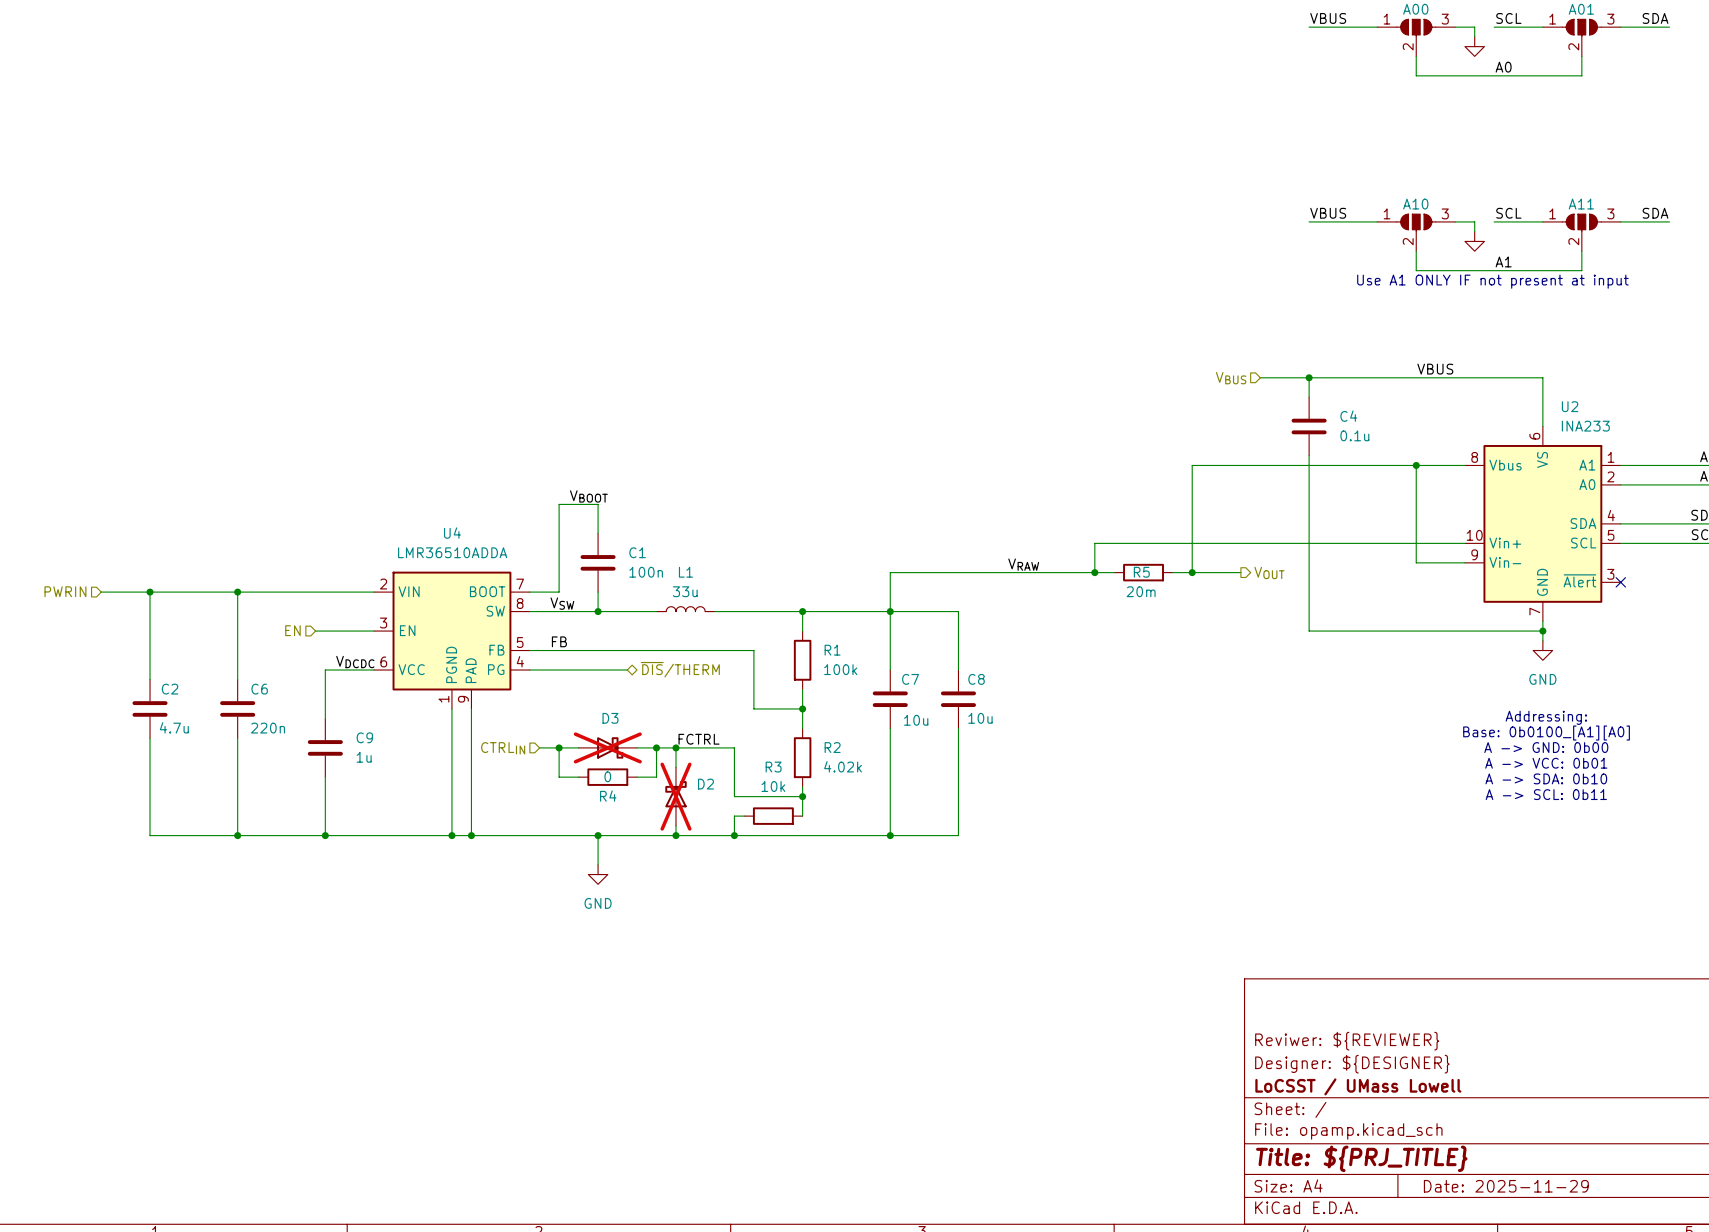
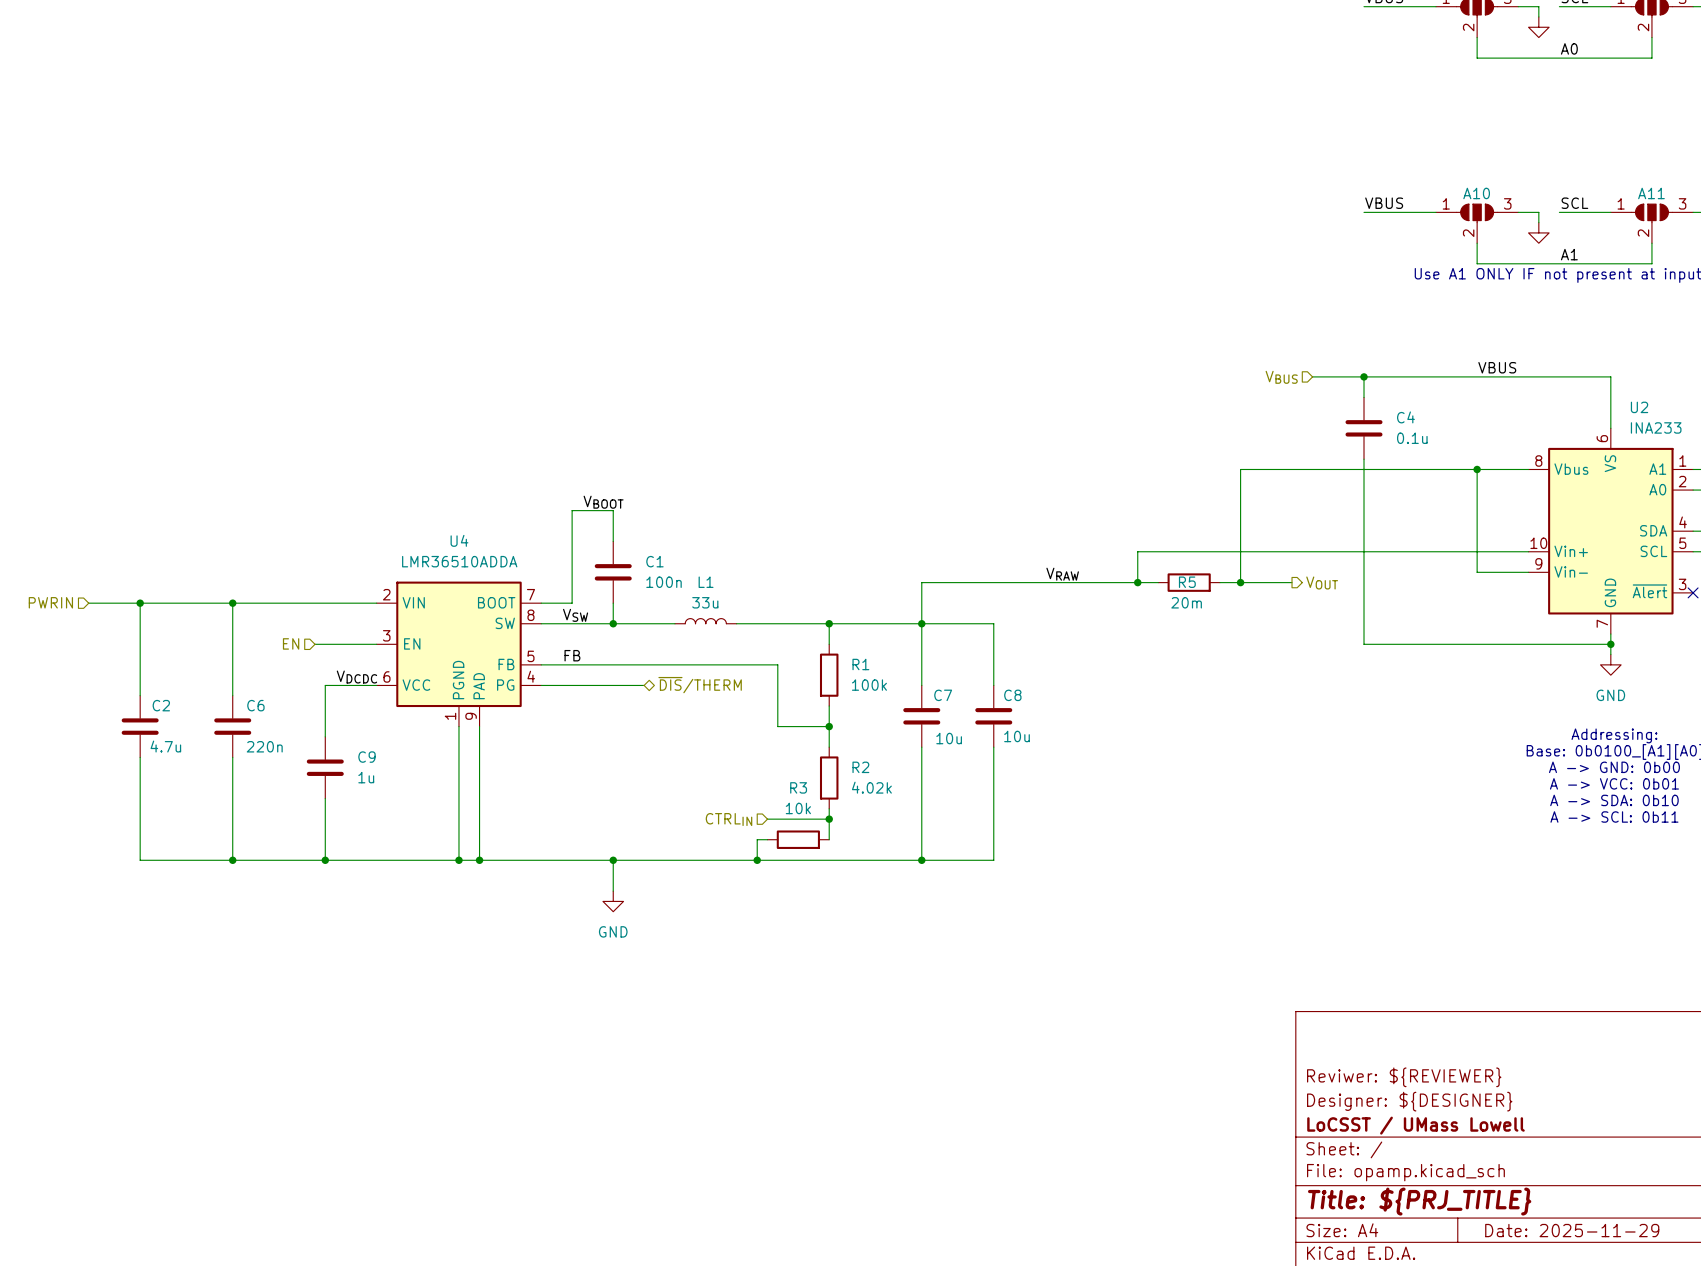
label: FCTRL (699, 739) -> none
wire: (539, 747) (578, 747) -> none
wire: (559, 747) (559, 777) (578, 777) -> none
junction: (559, 747) -> none
D3: (607, 747) -> none
wire: (637, 747) (734, 747) (734, 796) (744, 796) -> none
wire: (656, 747) (656, 777) (637, 777) -> none
junction: (656, 747) -> none
wire: (675, 747) (675, 767) -> none
junction: (675, 747) -> none
hierarchical label: CTRLIN (503, 748) -> none
R4: 0 (607, 777) -> none
D2: (675, 796) -> none
hierarchical label: none -> CTRLIN (729, 819)
wire: (675, 825) (675, 835) -> none
junction: (675, 835) -> none

